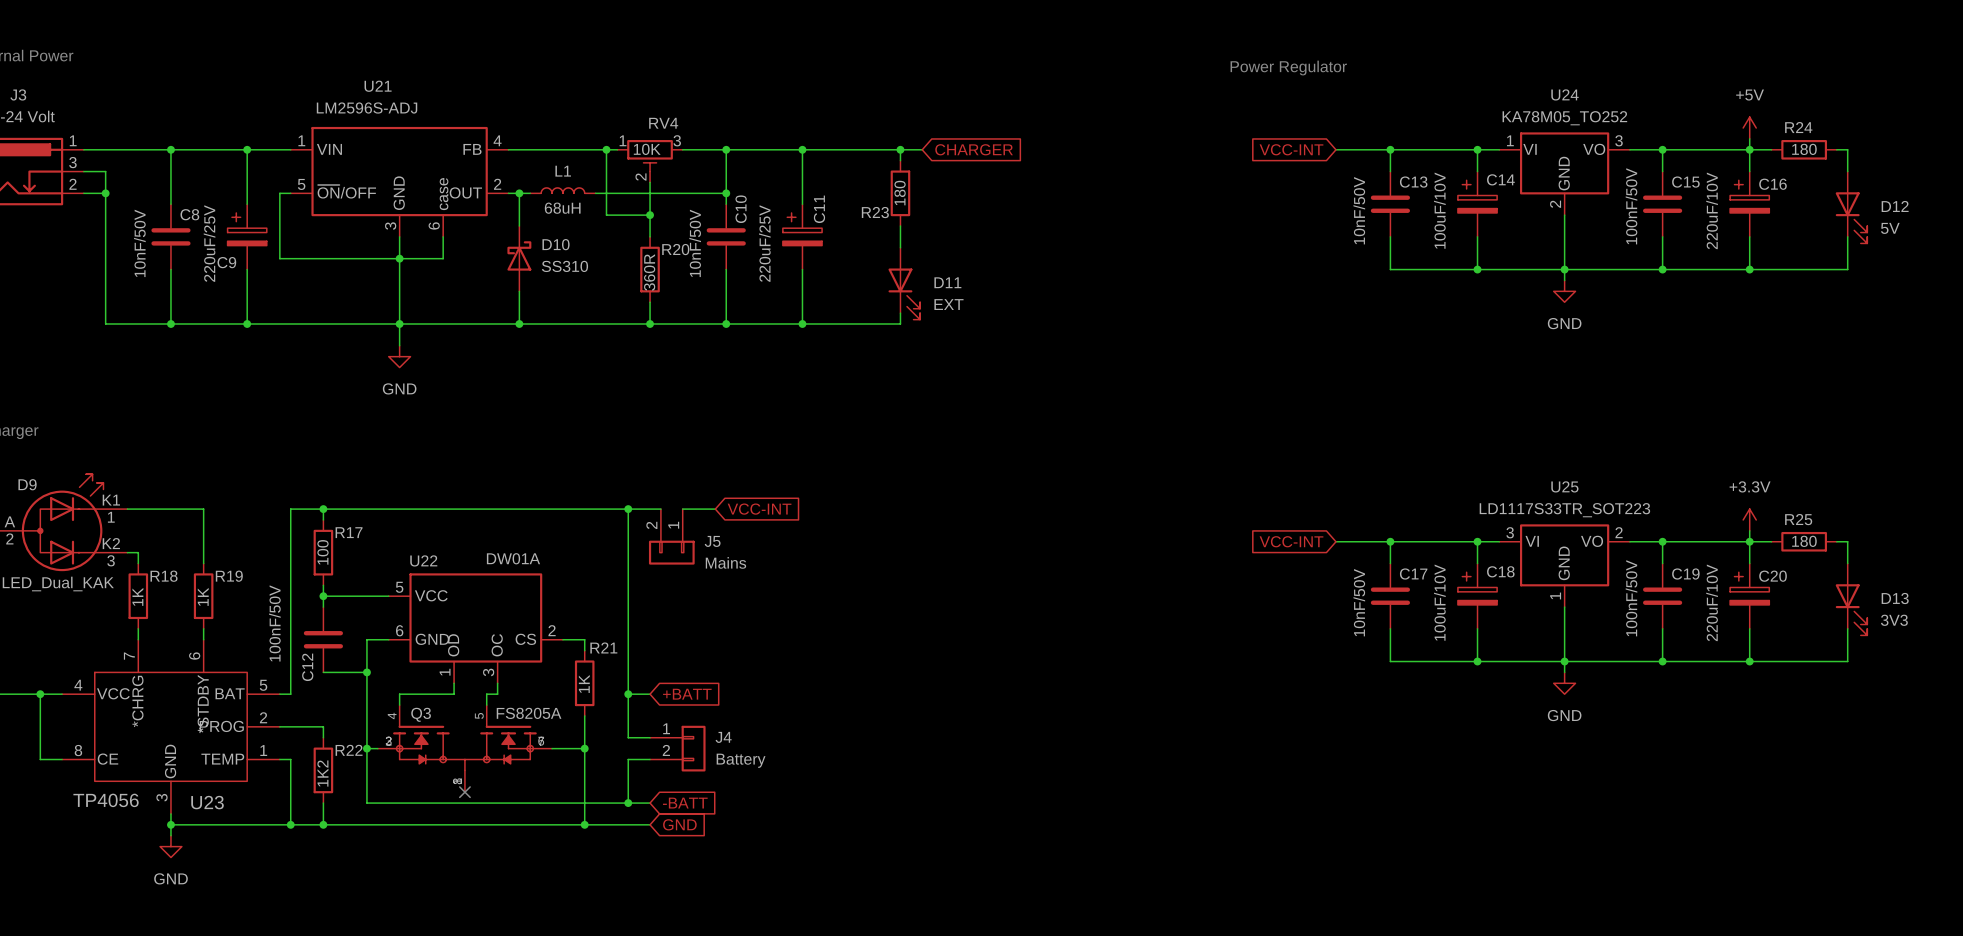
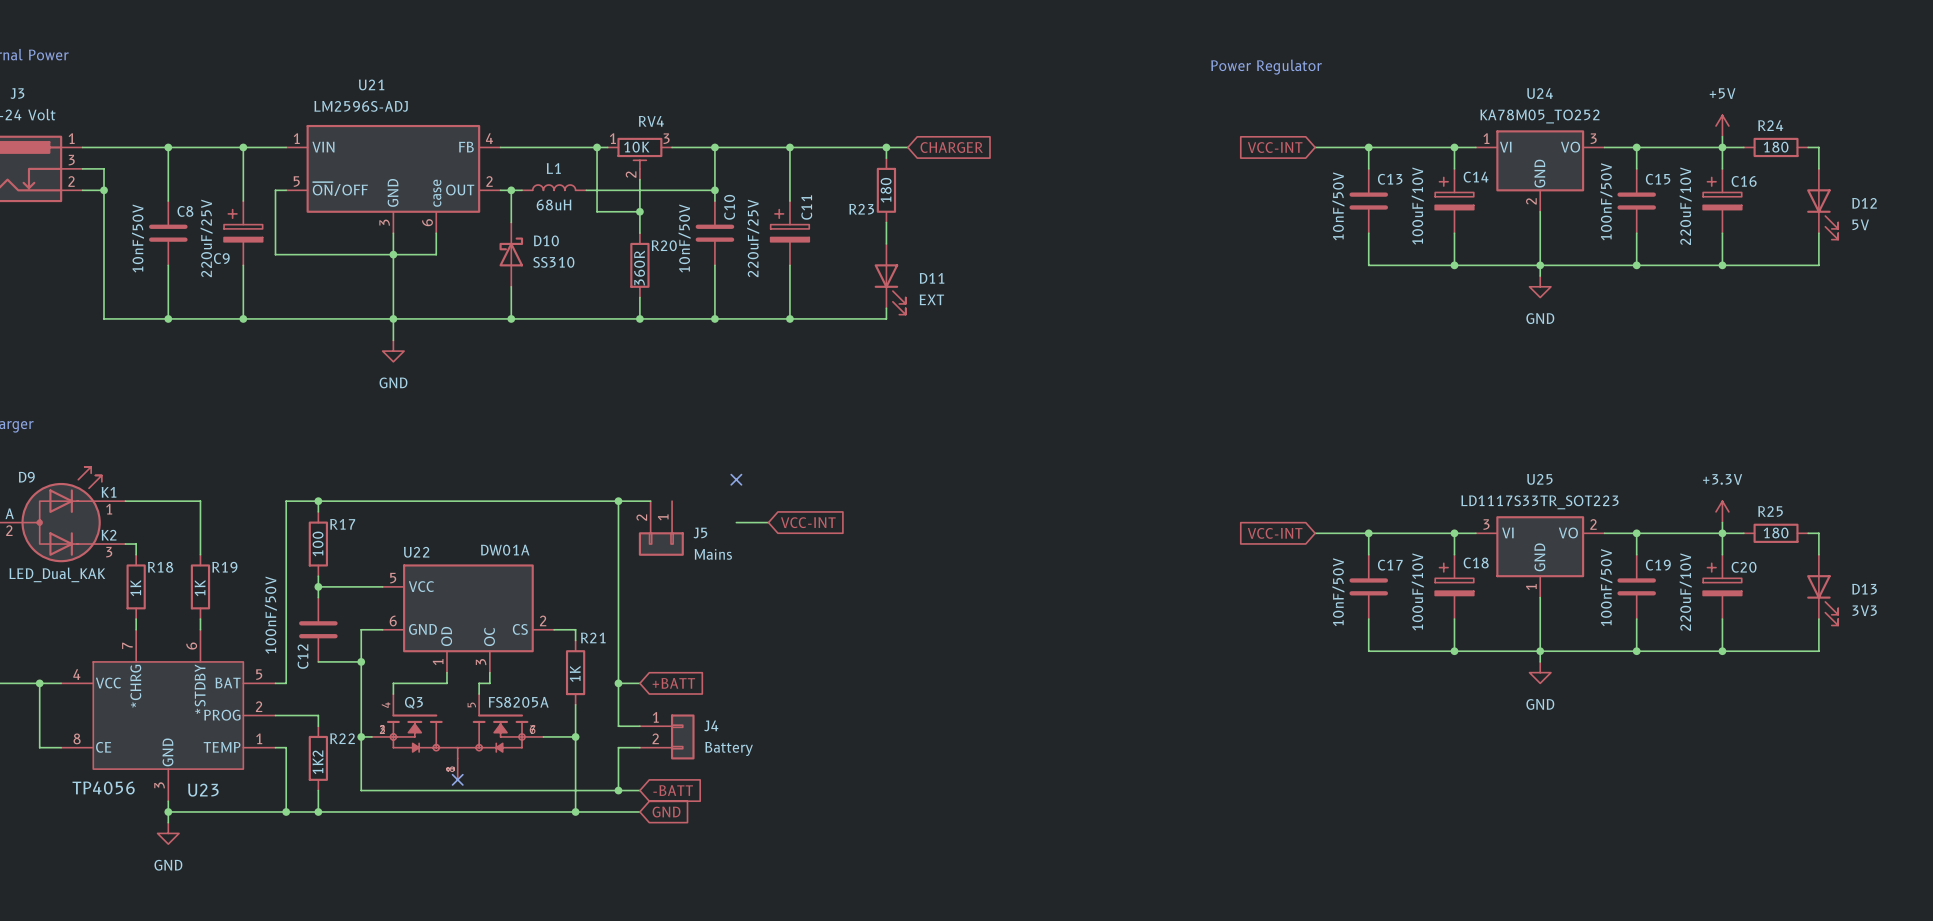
no-connect mark: none -> (736, 479)
wire: (682, 509) (715, 509) -> (736, 522) (768, 522)
global label position: VCC-INT (759, 509) -> VCC-INT (808, 522)

